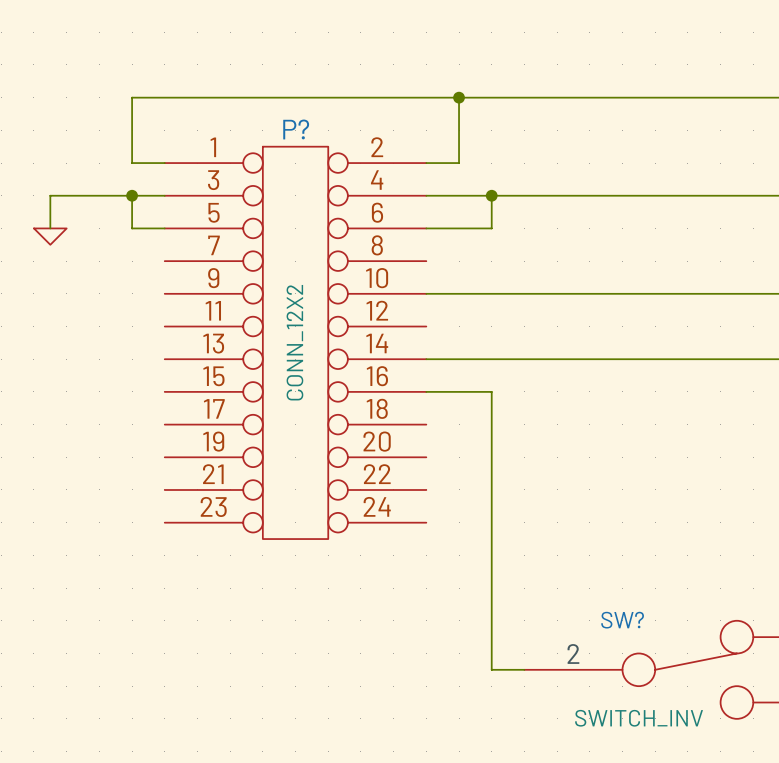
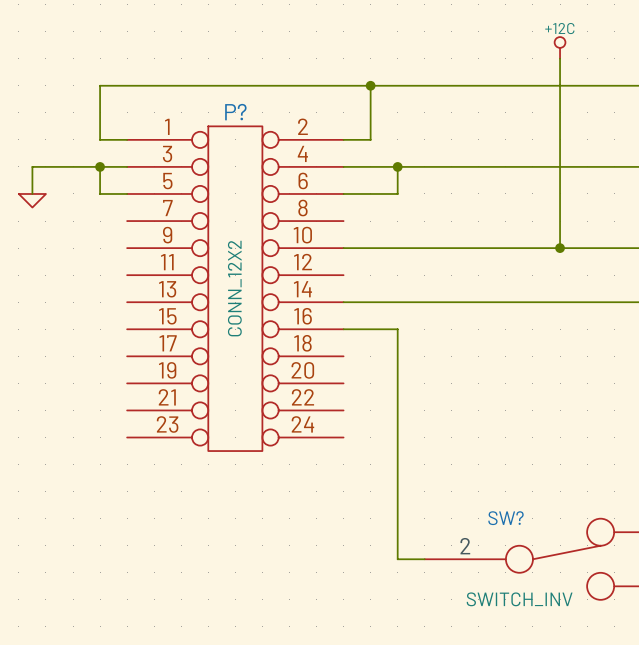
power symbol: none -> +12C (560, 47)
wire: none -> (560, 58) (560, 248)
junction: none -> (560, 248)

